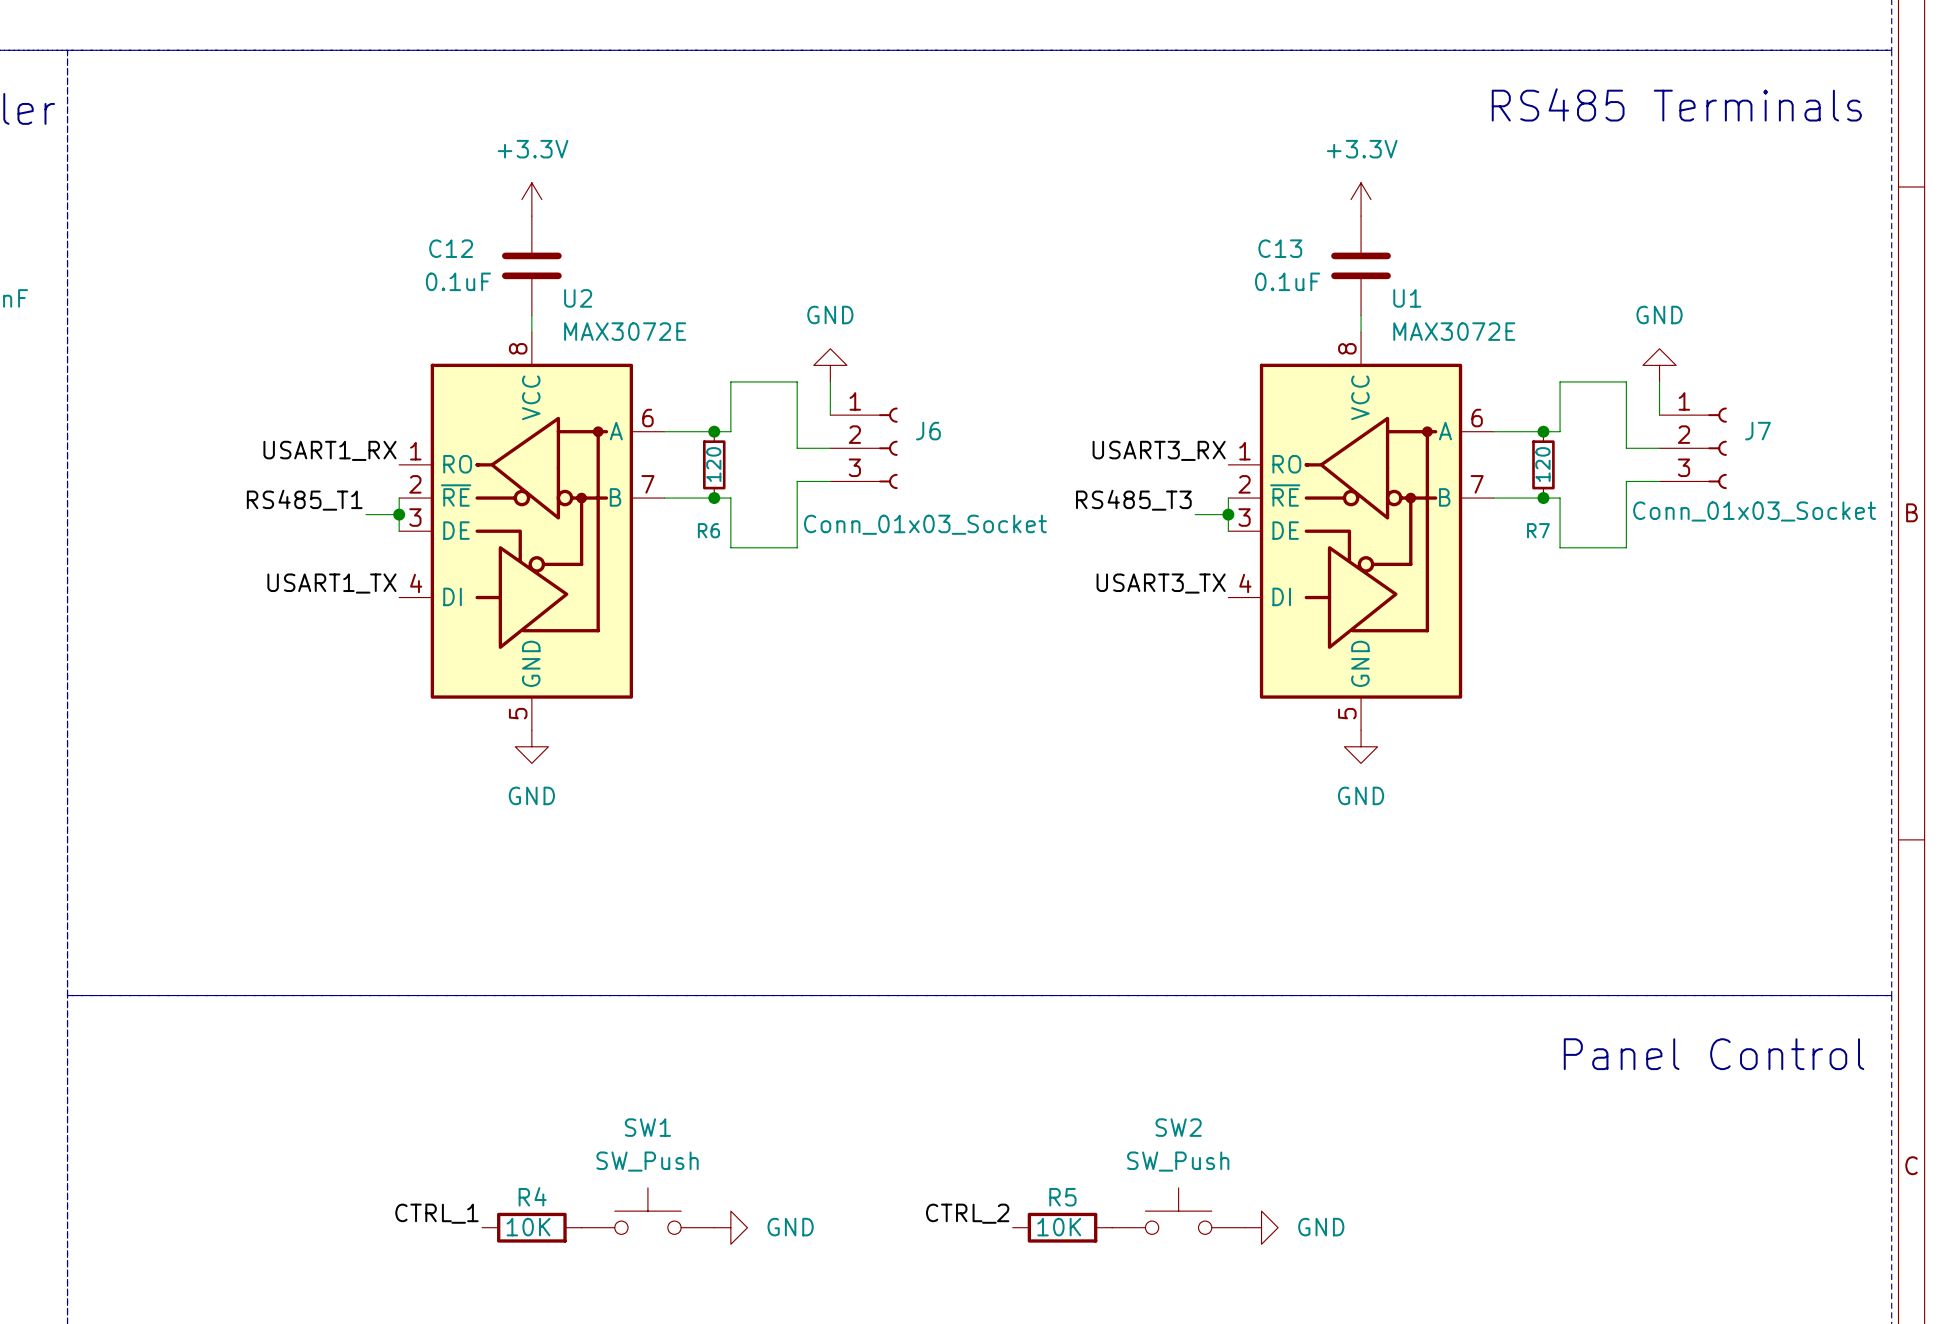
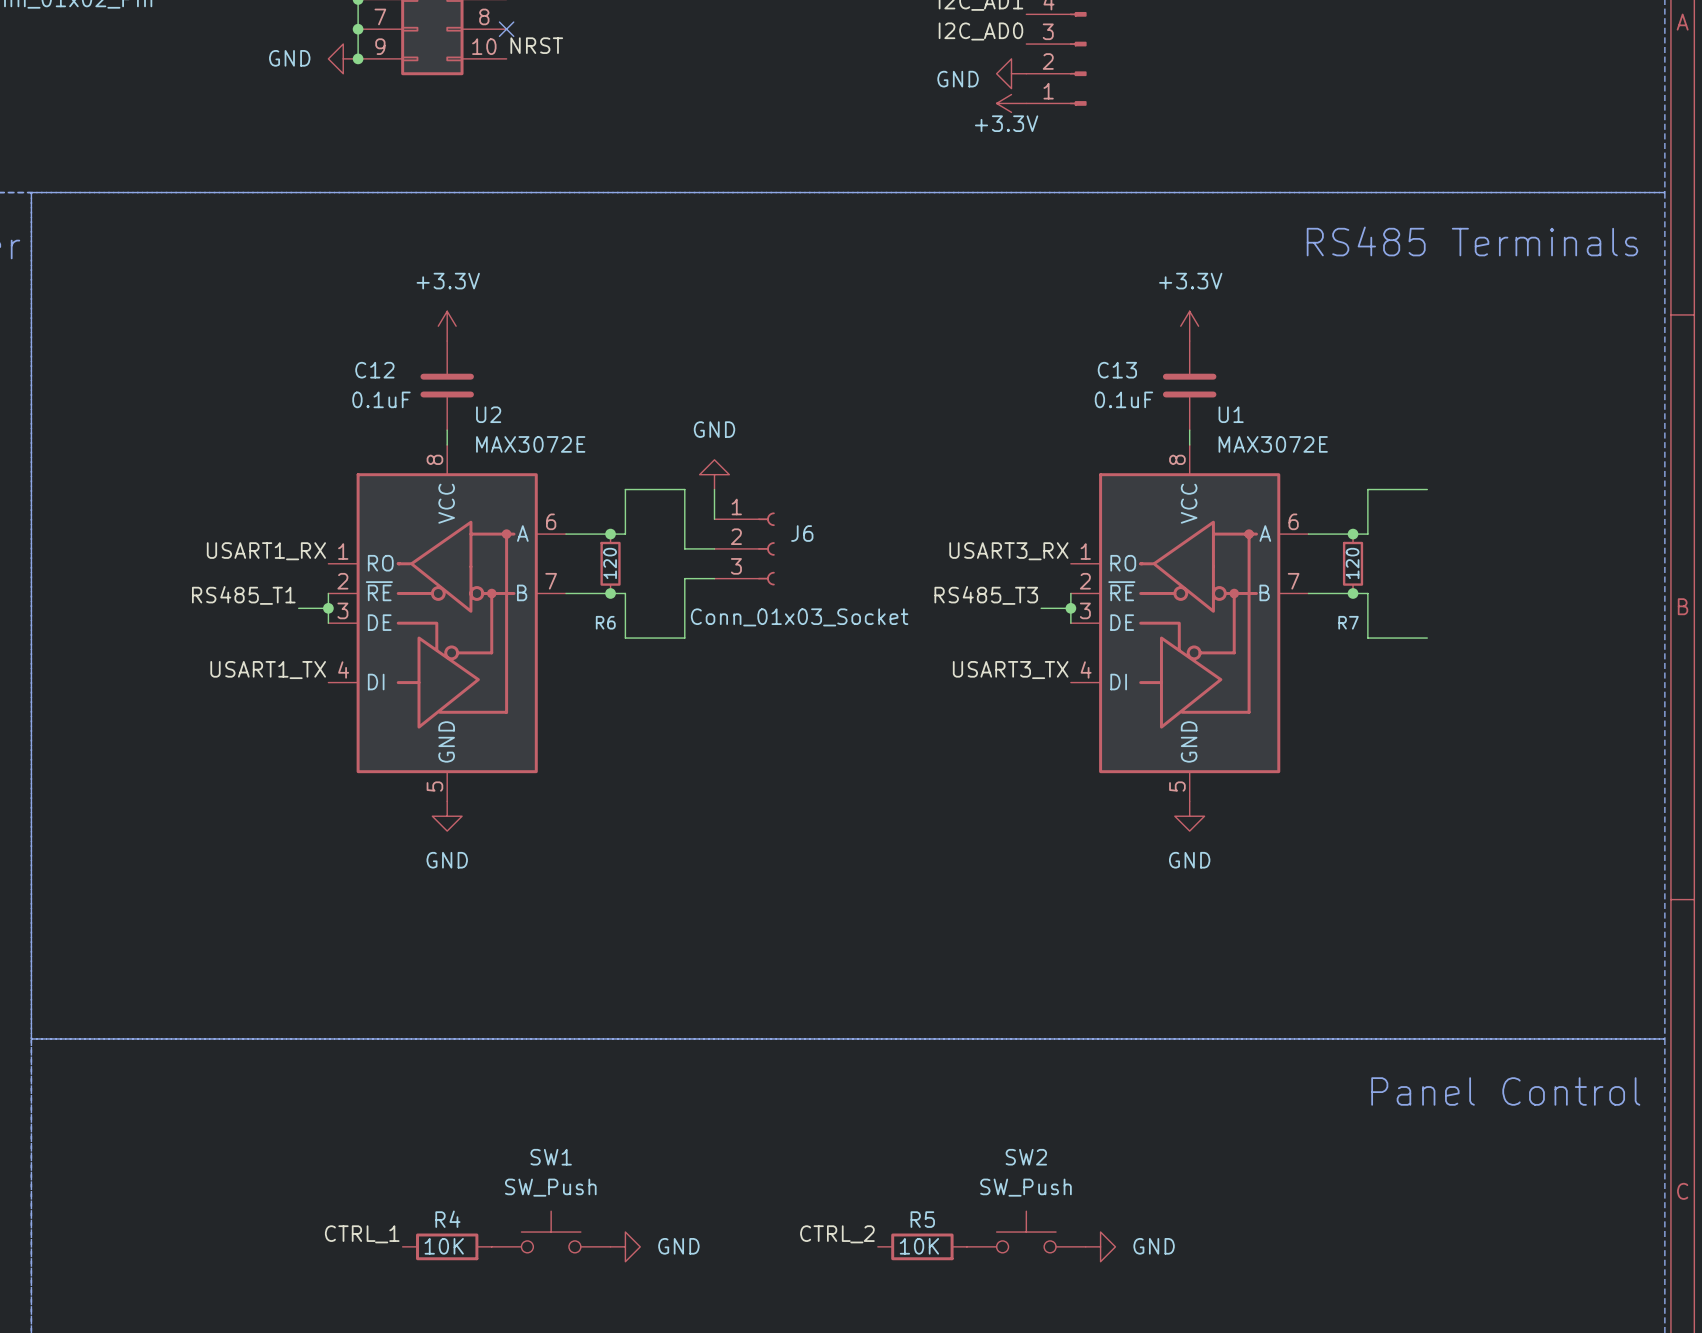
power symbol: GND (1659, 365) -> none
wire: (1626, 381) (1626, 448) (1659, 448) -> none
wire: (1659, 381) (1659, 415) -> none
J7: Conn_01x03_Socket (1693, 448) -> none
wire: (1659, 481) (1626, 481) (1626, 547) -> none

